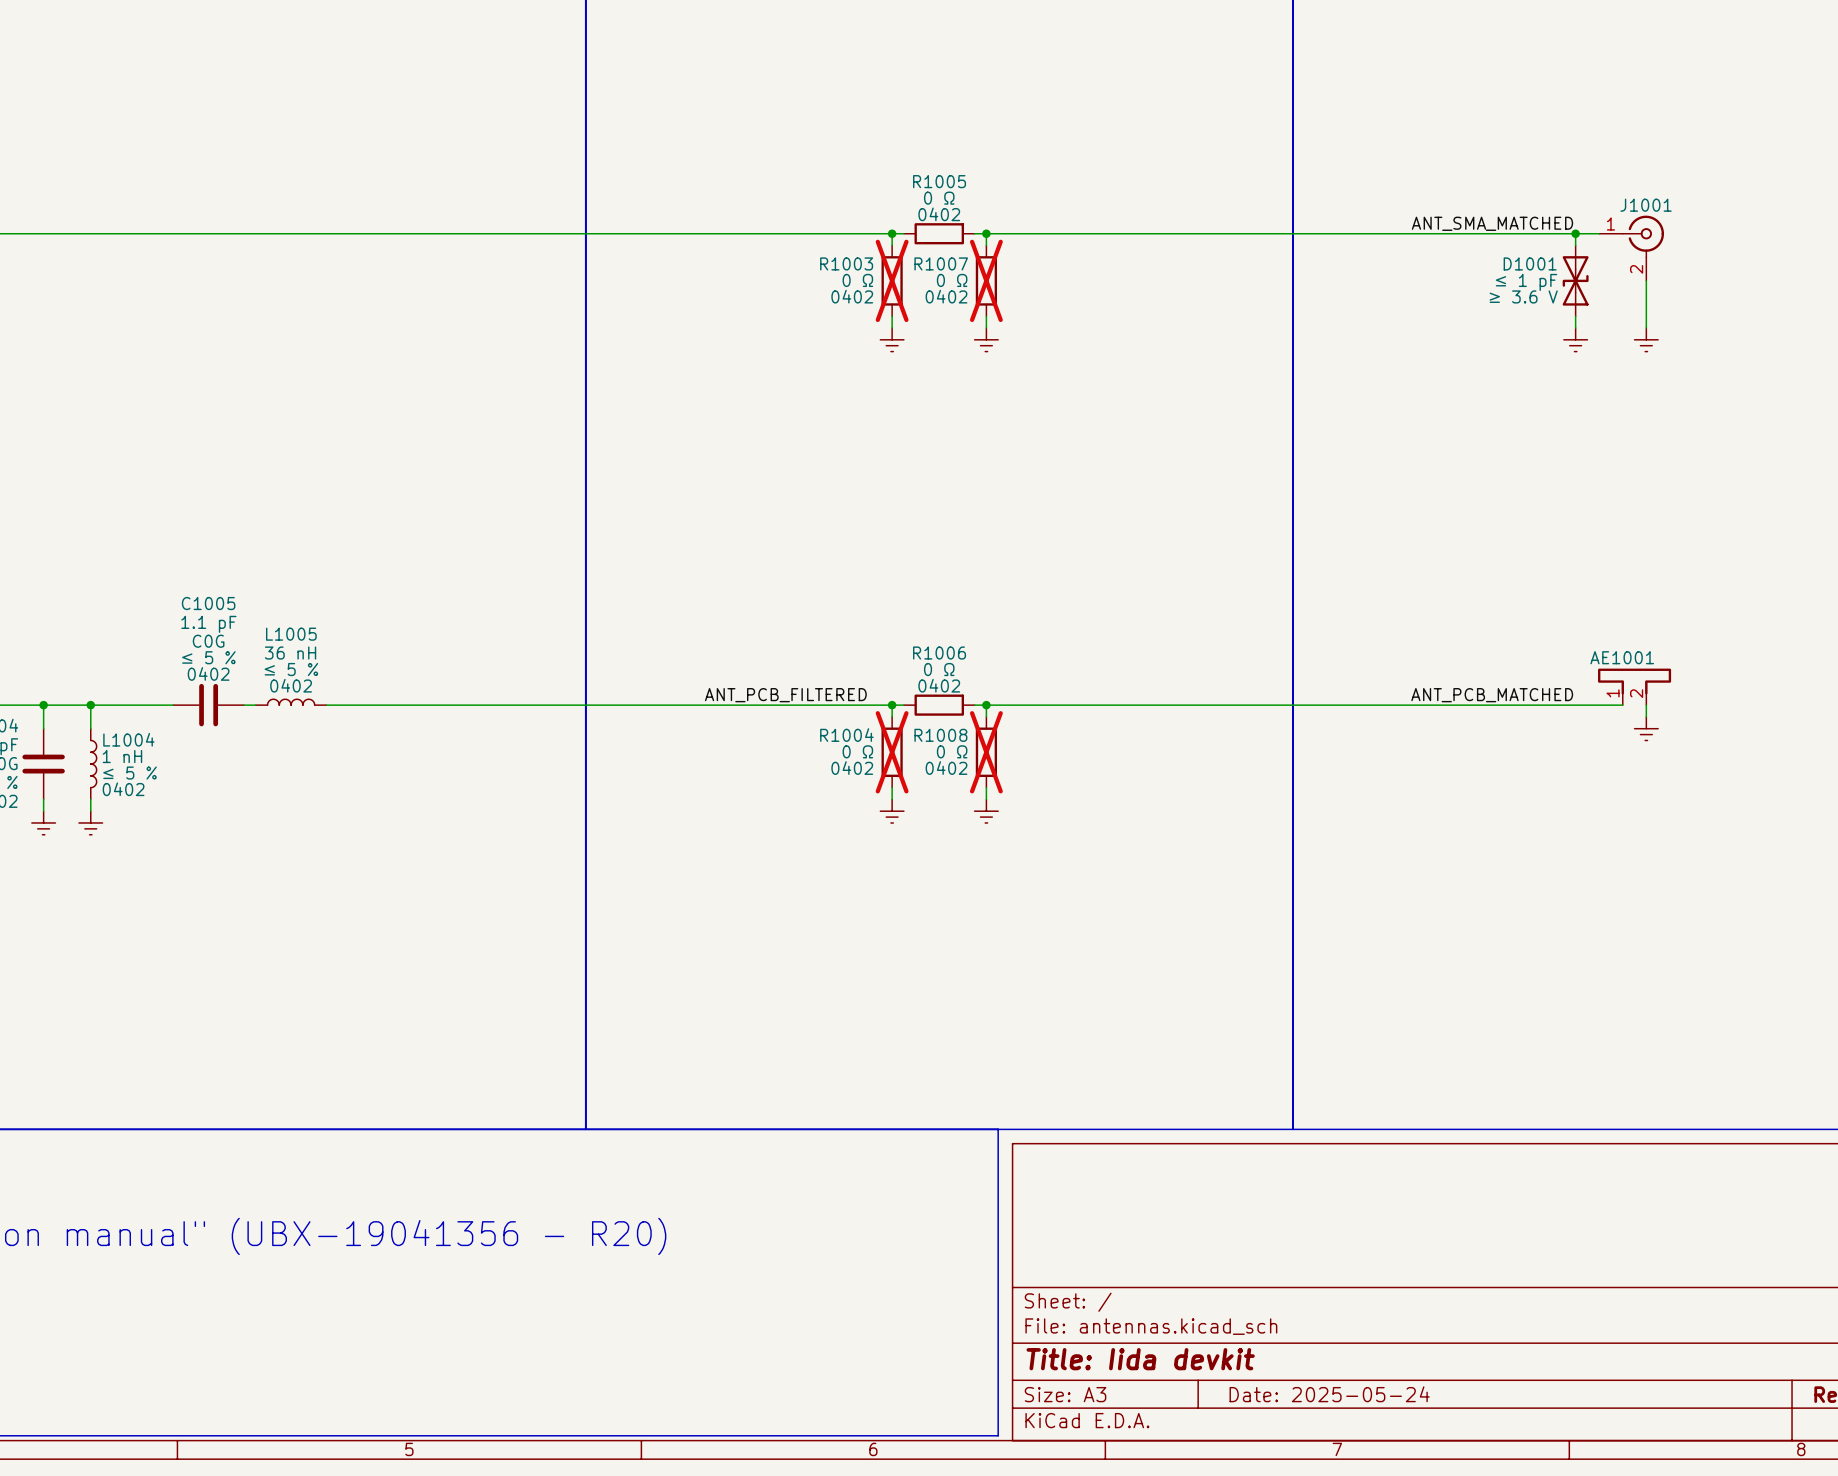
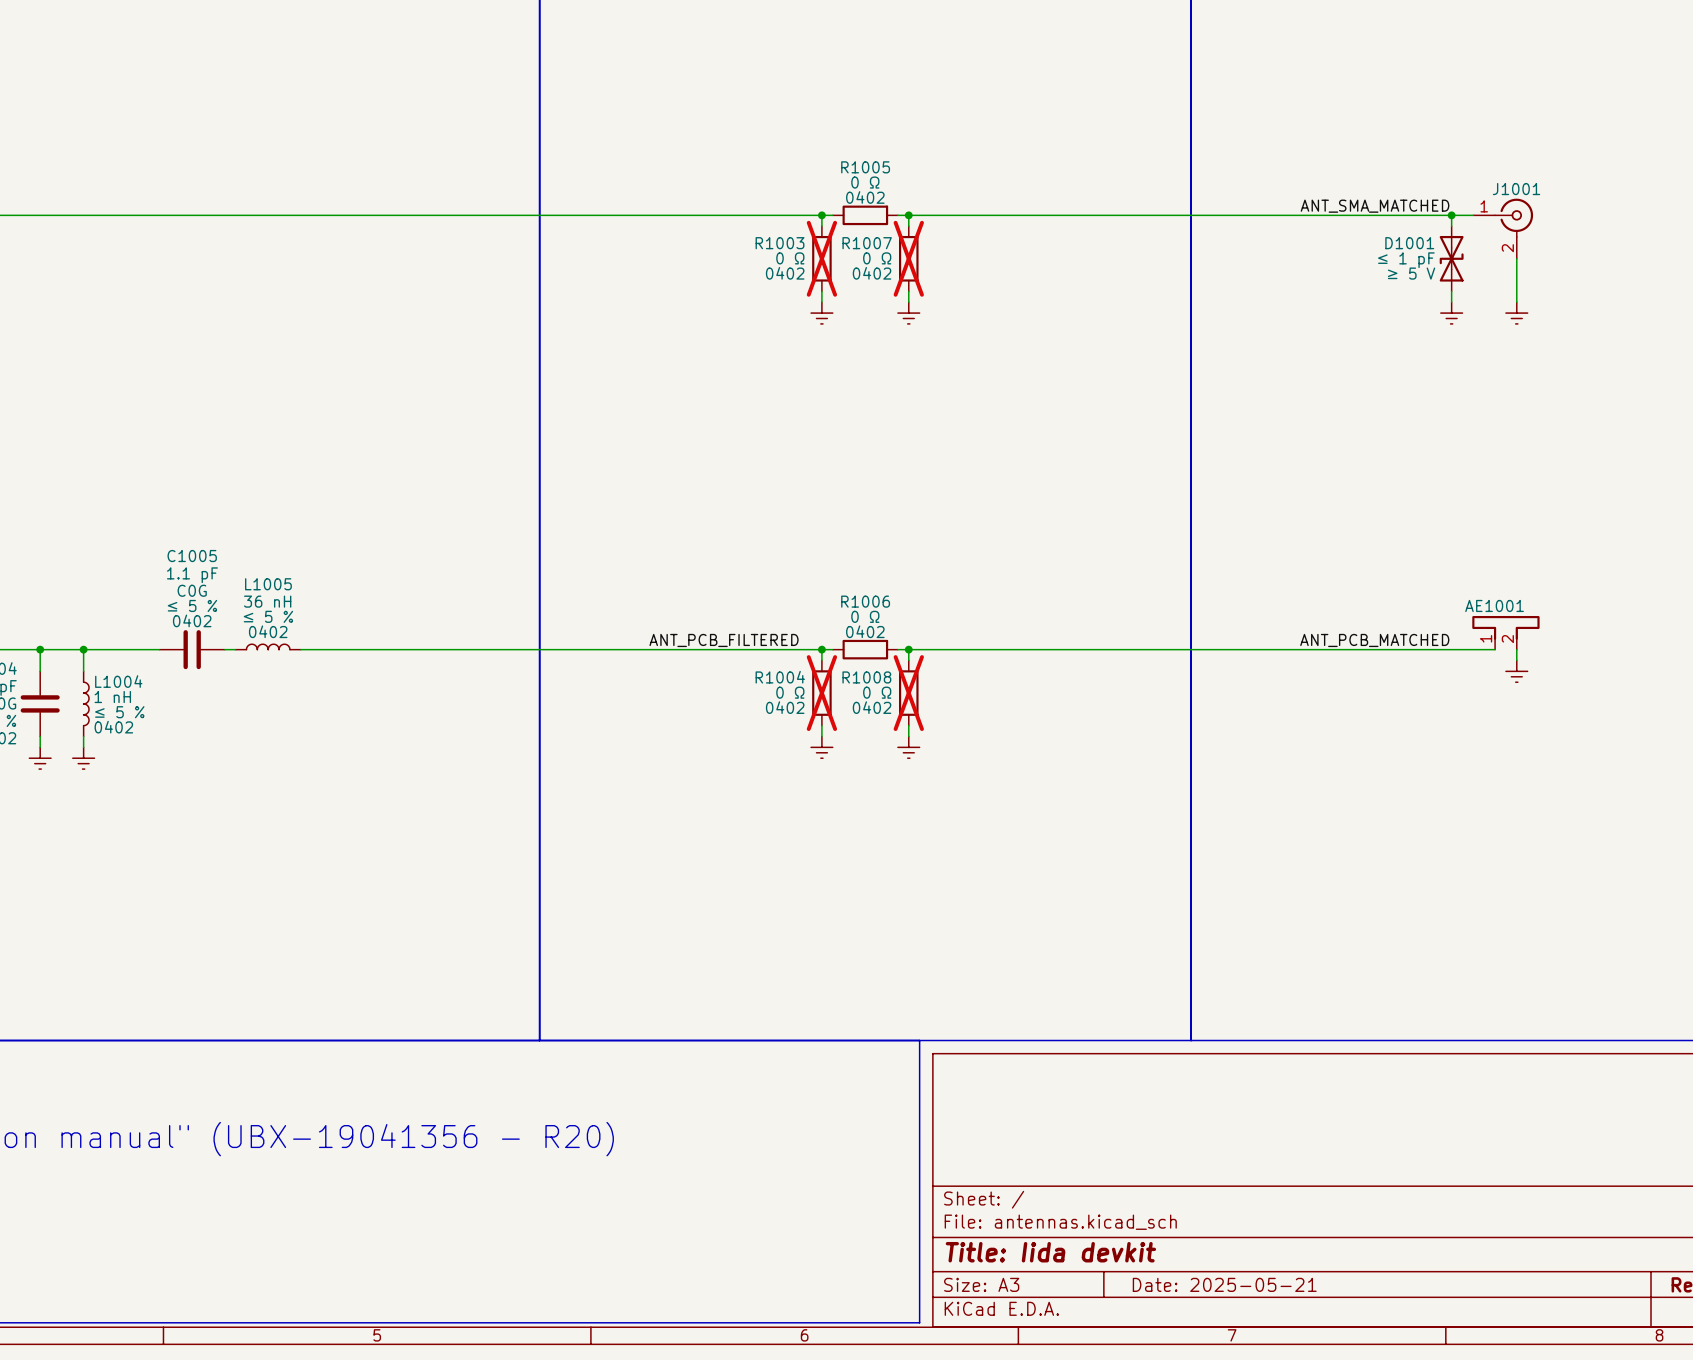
D1001 text: ≥ 3.6 V (1523, 296) -> ≥ 5 V (1411, 273)
title block: Date: 2025-05-24 (1329, 1394) -> Date: 2025-05-21 (1224, 1284)

